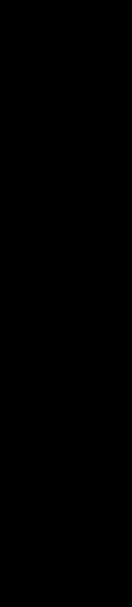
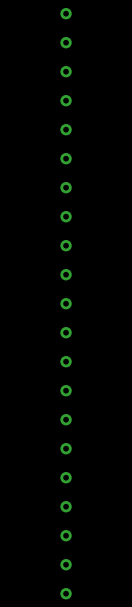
via: none -> (66, 13)
via: none -> (66, 42)
via: none -> (66, 71)
via: none -> (66, 100)
via: none -> (66, 129)
via: none -> (66, 158)
via: none -> (66, 187)
via: none -> (66, 216)
via: none -> (66, 245)
via: none -> (66, 274)
via: none -> (66, 303)
via: none -> (66, 332)
via: none -> (66, 361)
via: none -> (66, 390)
via: none -> (66, 419)
via: none -> (66, 448)
via: none -> (66, 477)
via: none -> (66, 506)
via: none -> (66, 535)
via: none -> (66, 564)
via: none -> (66, 593)

